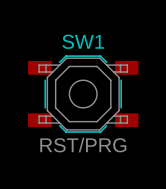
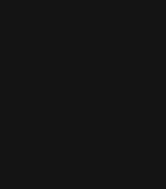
SW1: RST/PRG (83, 94) -> none

